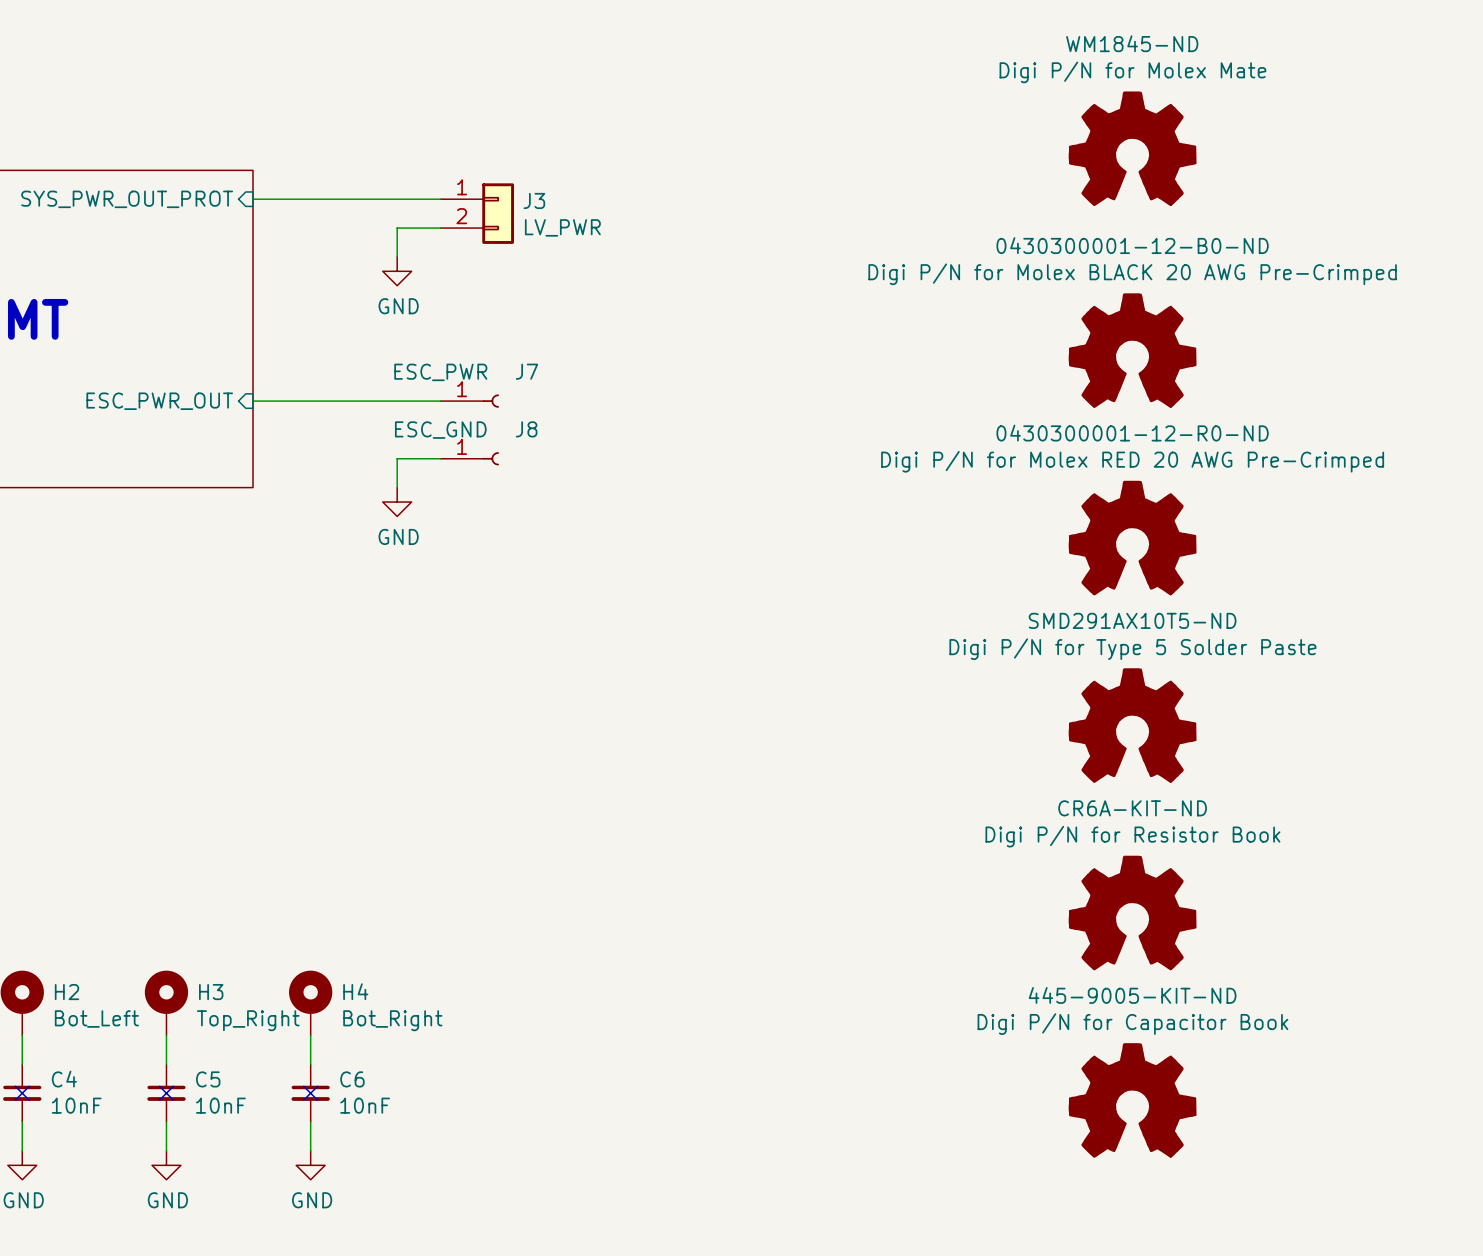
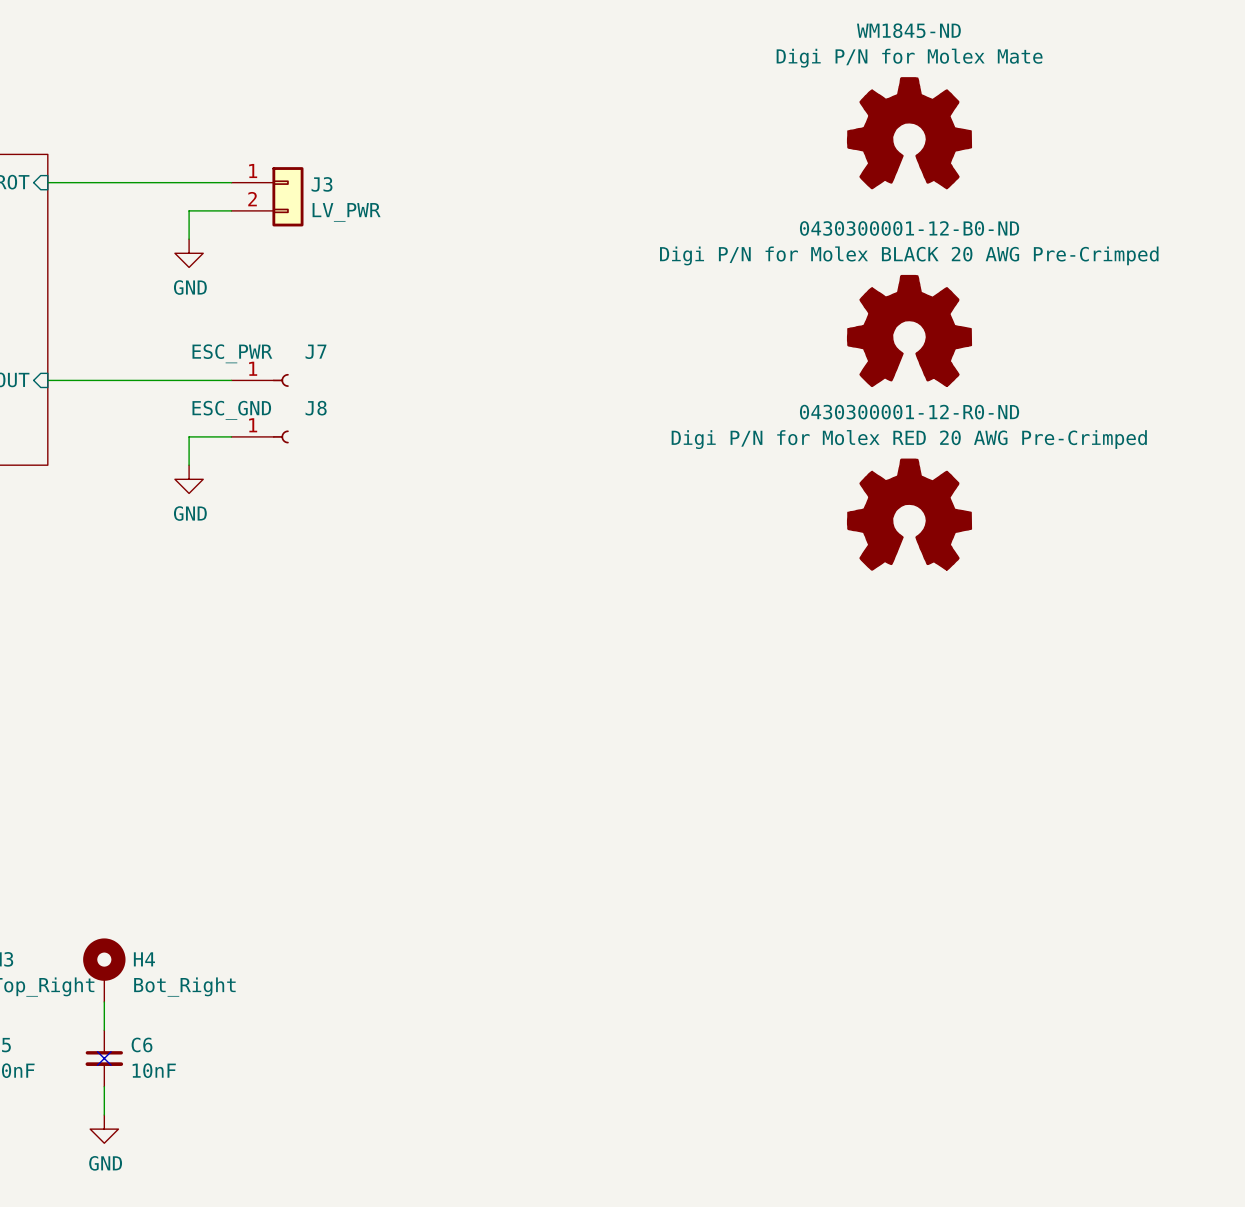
power symbol: (1132, 725) -> none
power symbol: (1132, 912) -> none
power symbol: (1132, 1100) -> none

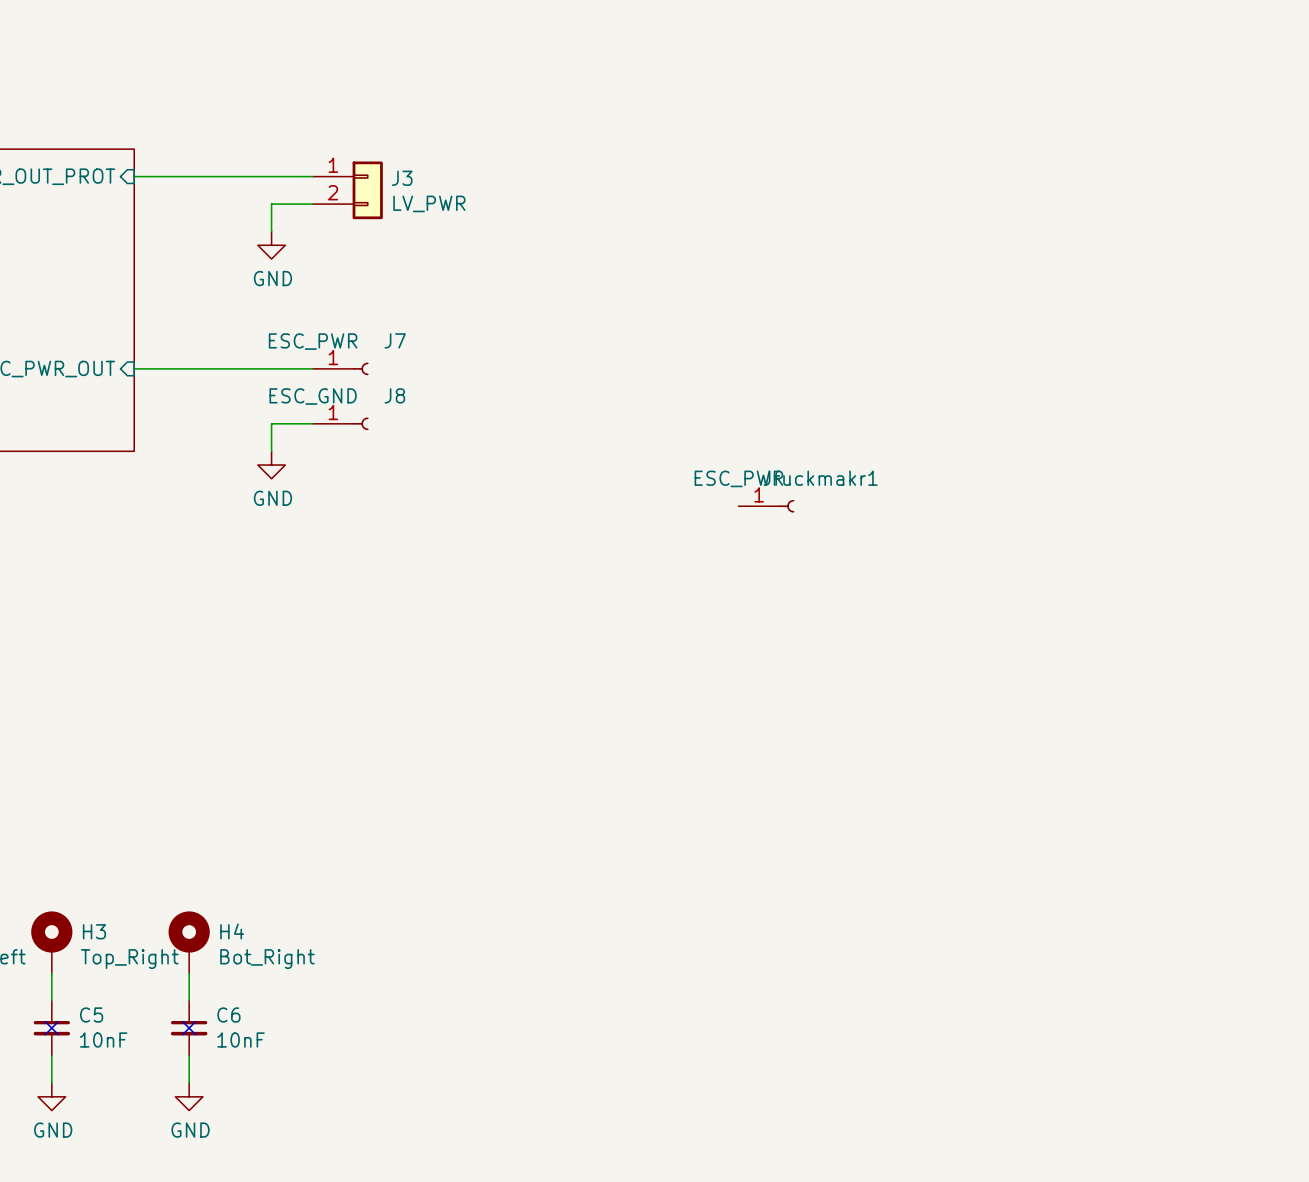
power symbol: (909, 133) -> none
power symbol: (909, 330) -> none
power symbol: (909, 514) -> none
Jfuckmakr1: none -> ESC_PWR (766, 506)

